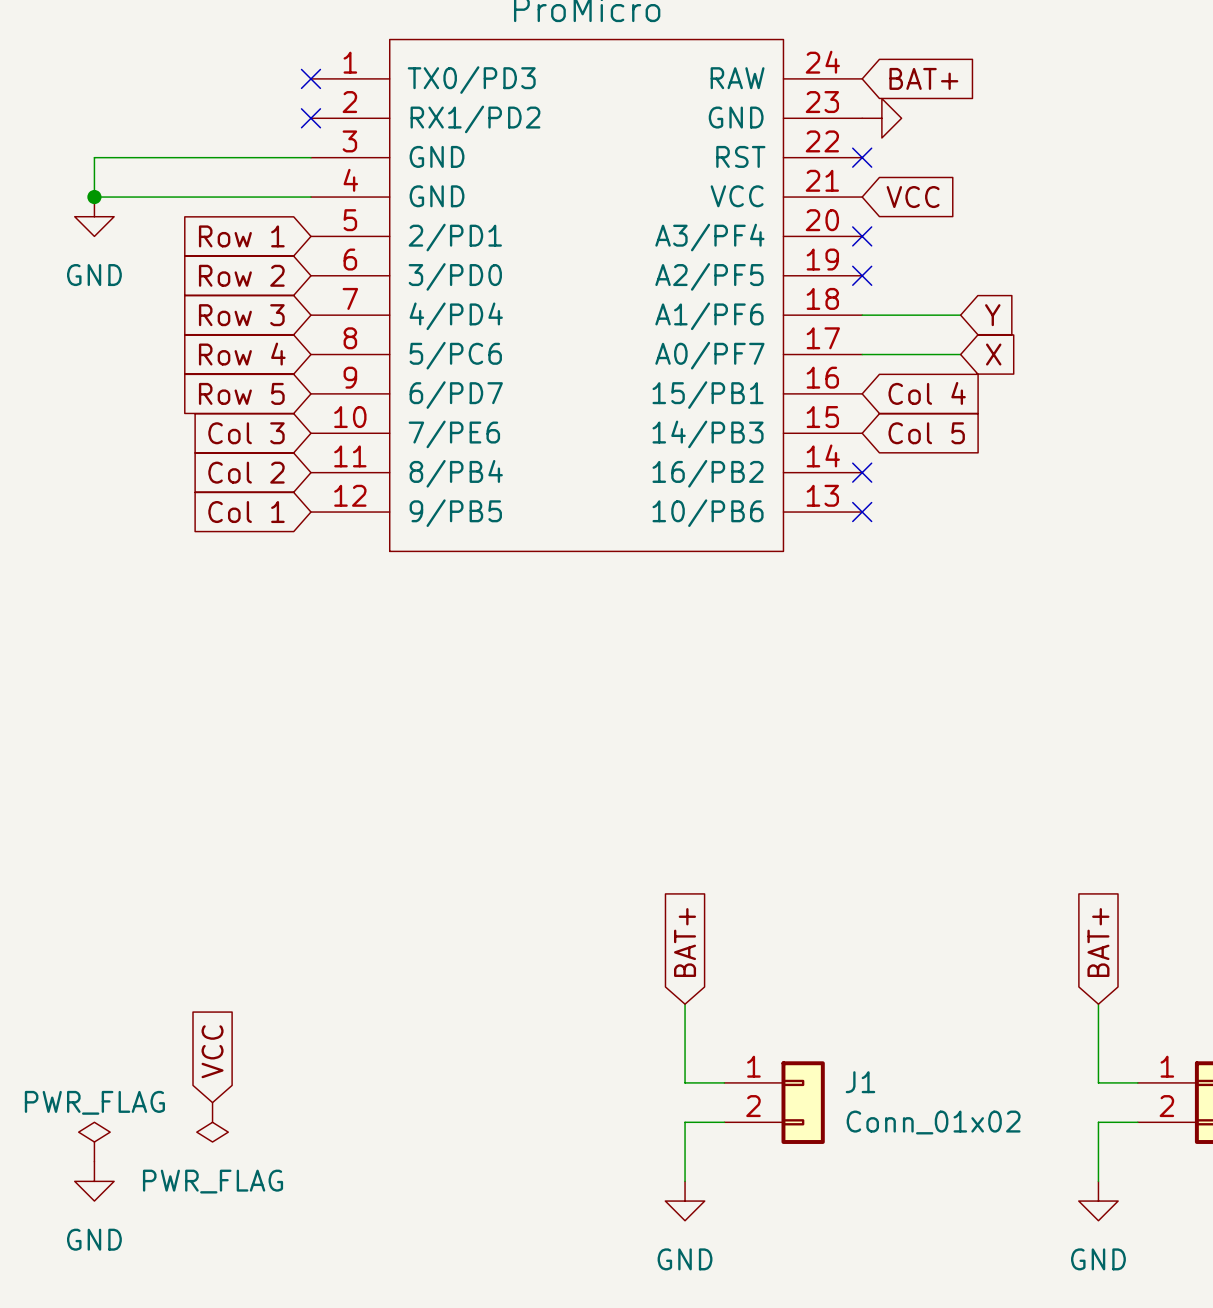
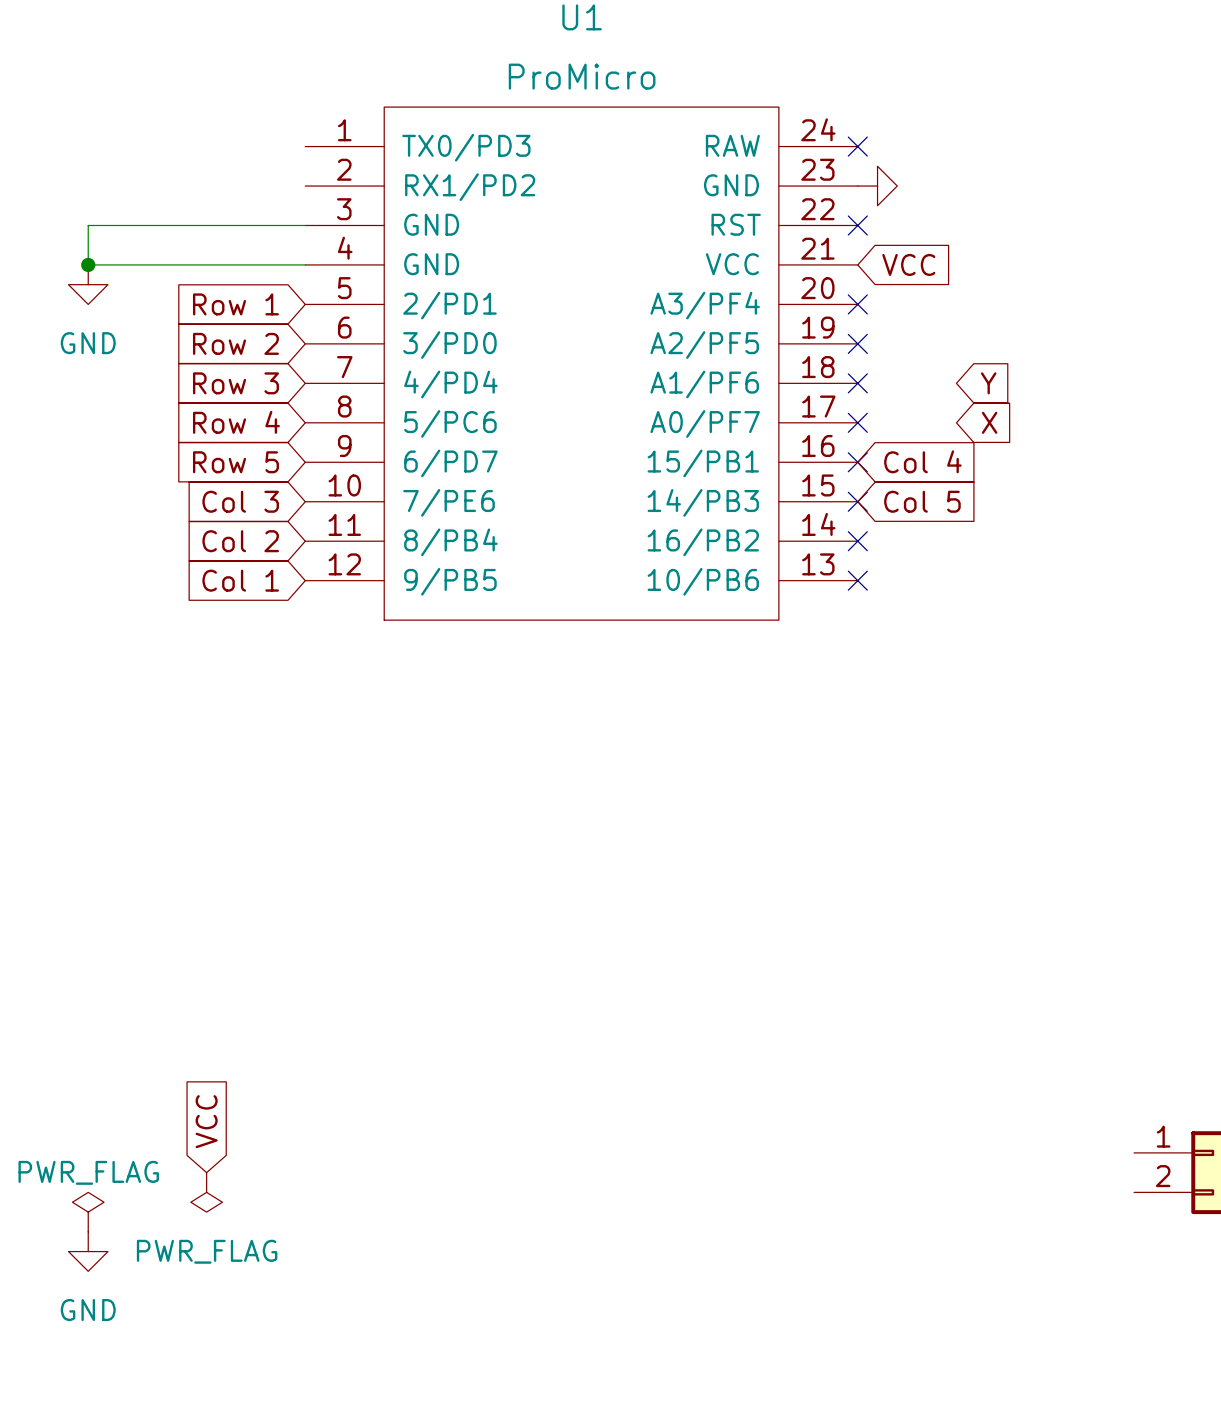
no-connect mark: (310, 78) -> none
no-connect mark: none -> (857, 146)
global label: BAT+ (923, 78) -> none
no-connect mark: (310, 118) -> none
wire: (862, 315) (960, 315) -> none
no-connect mark: none -> (857, 383)
wire: (862, 354) (960, 354) -> none
no-connect mark: none -> (857, 422)
no-connect mark: none -> (857, 462)
no-connect mark: none -> (857, 501)
global label: BAT+ (685, 942) -> none
global label: BAT+ (1098, 942) -> none
wire: (685, 1004) (685, 1082) (724, 1082) -> none
wire: (1098, 1004) (1098, 1082) (1137, 1082) -> none
J1: Conn_01x02 (774, 1102) -> none
wire: (724, 1122) (685, 1122) (685, 1181) -> none
wire: (1137, 1122) (1098, 1122) (1098, 1181) -> none
power symbol: GND (685, 1201) -> none
power symbol: GND (1098, 1201) -> none

